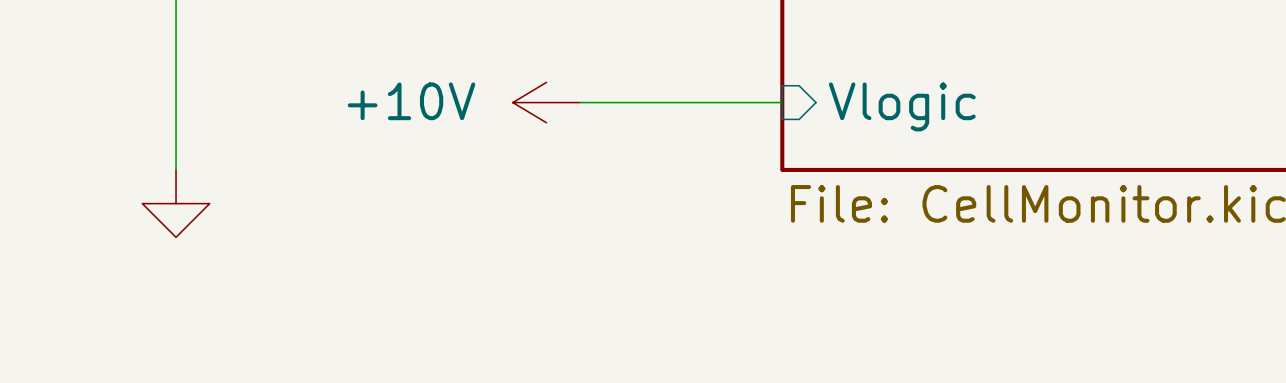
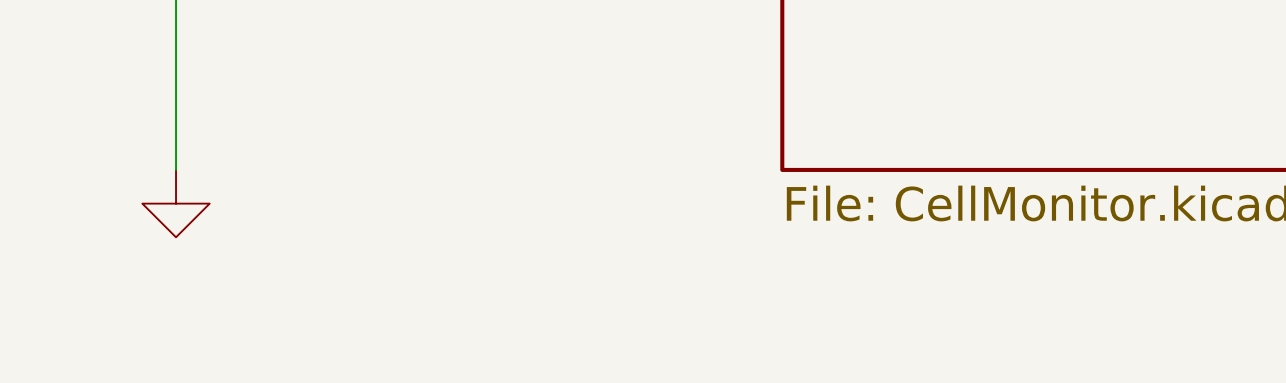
power symbol: +10V (546, 102) -> none
wire: (580, 102) (782, 102) -> none
sheet pin: Vlogic (902, 106) -> none

